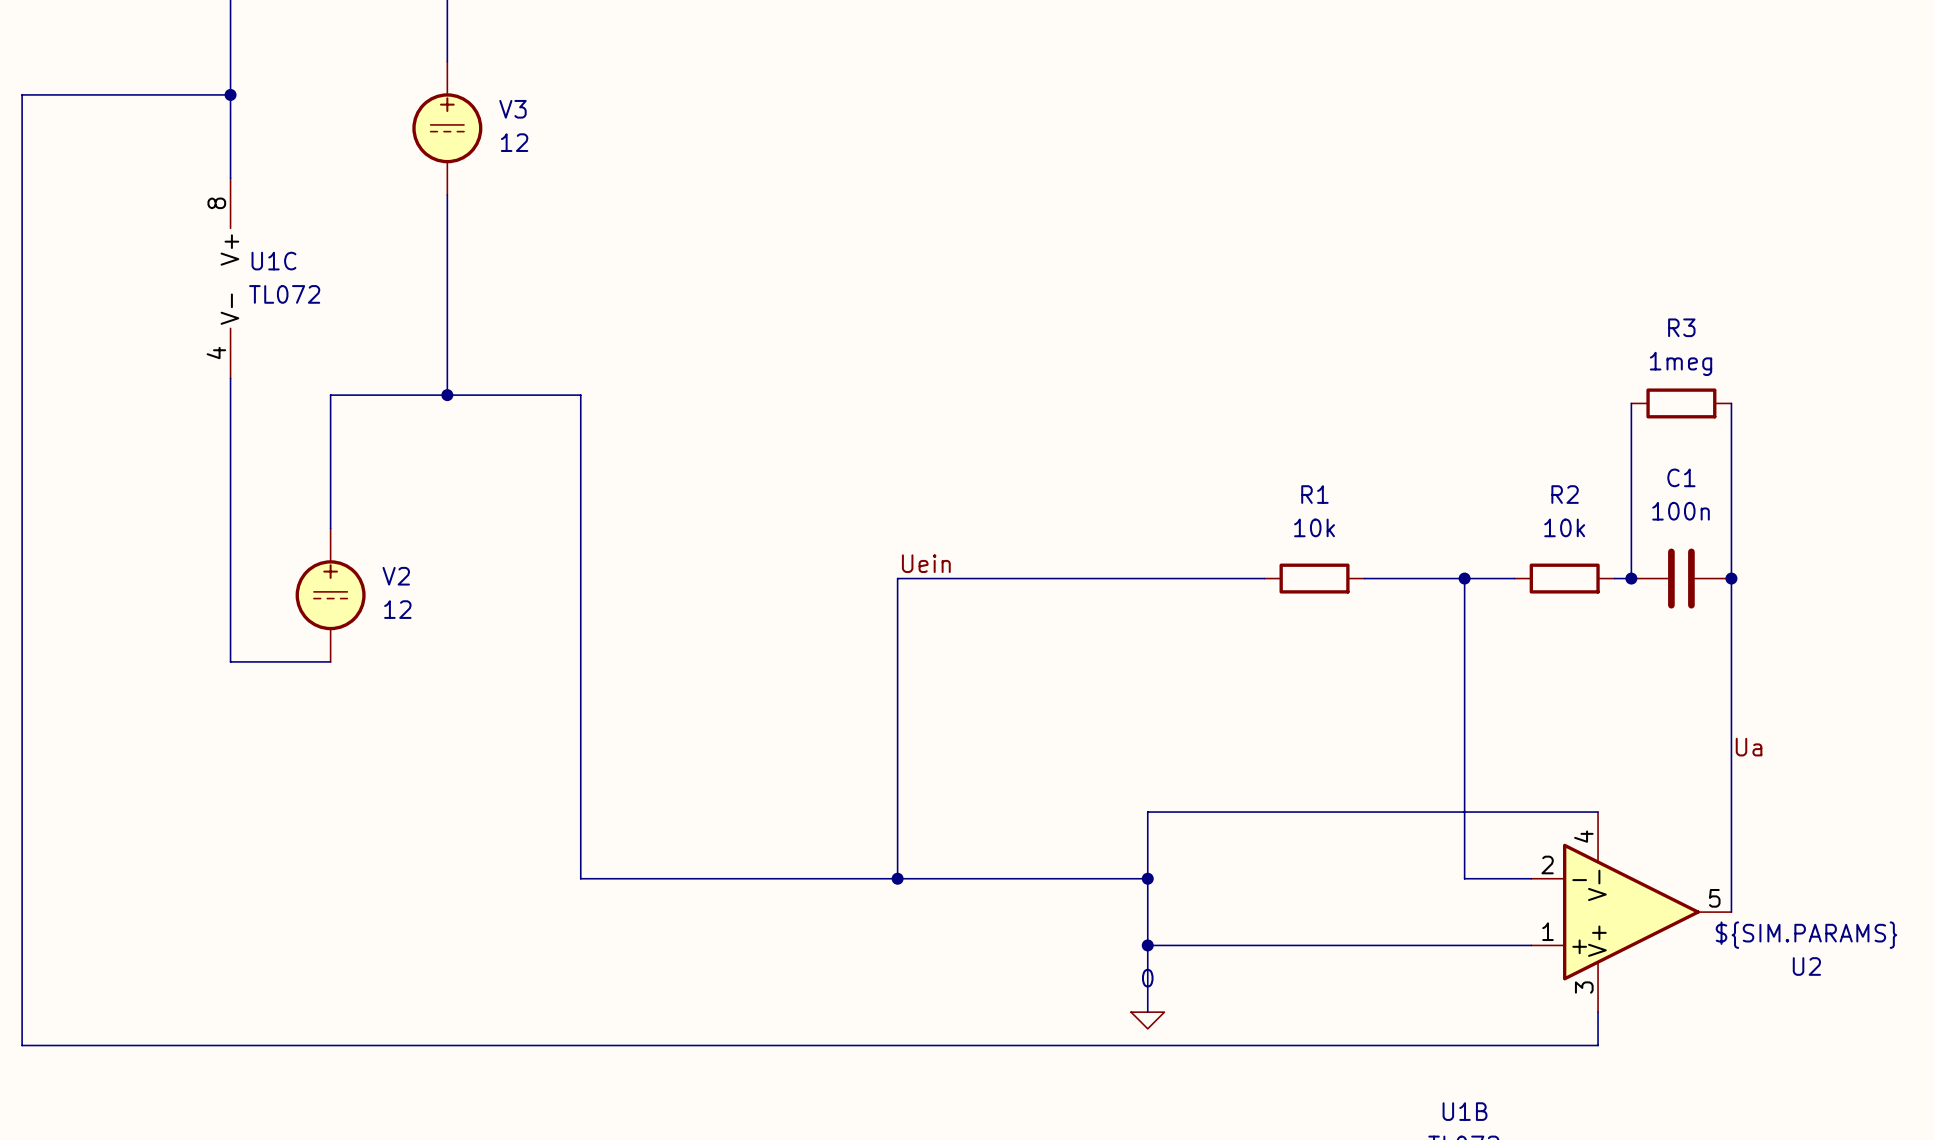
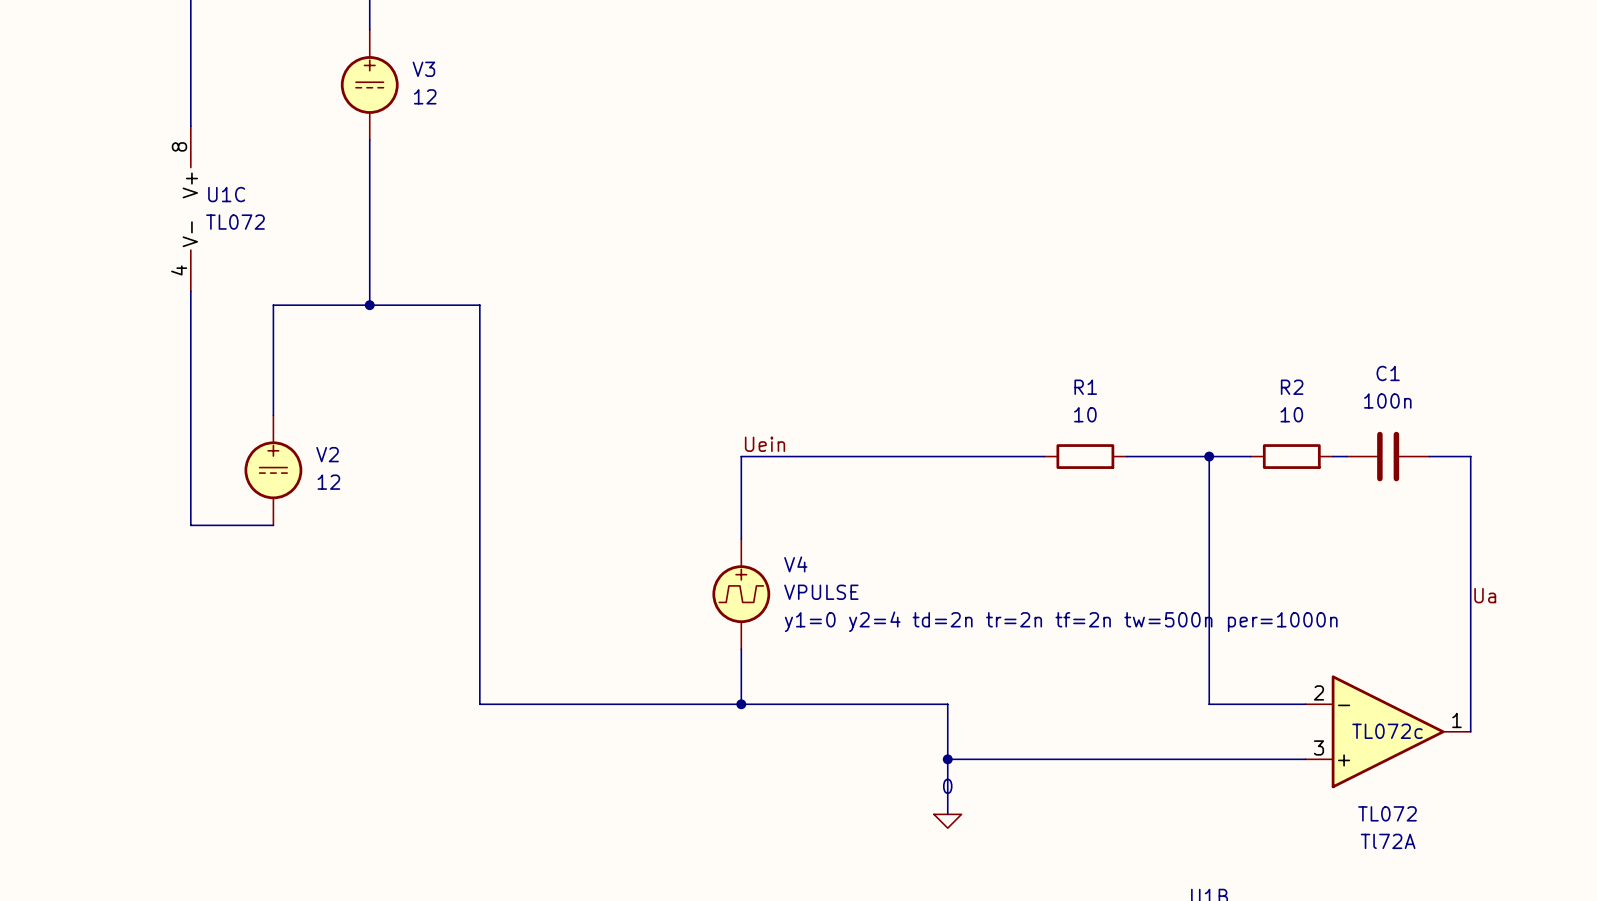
wire: (230, 94) (22, 94) (22, 1045) (1598, 1045) (1598, 1012) -> none
junction: (230, 94) -> none
wire: (1631, 403) (1631, 578) -> none
R3: 1meg (1681, 403) -> none
wire: (1731, 403) (1731, 912) -> none
R1 value: 10k (1314, 527) -> 10 (1085, 414)
R2 value: 10k (1564, 527) -> 10 (1291, 414)
junction: (1631, 578) -> none
wire: none -> (1429, 456) (1470, 456) (1470, 731)
junction: (1731, 578) -> none
V4: none -> VPULSE (741, 594)
label position: Ua (1749, 747) -> Ua (1485, 595)
wire: (1598, 812) (1147, 812) (1147, 878) -> none
junction: (1147, 878) -> none
U2: ${SIM.PARAMS} (1631, 912) -> none
Tl72A: none -> TL072 (1388, 731)

